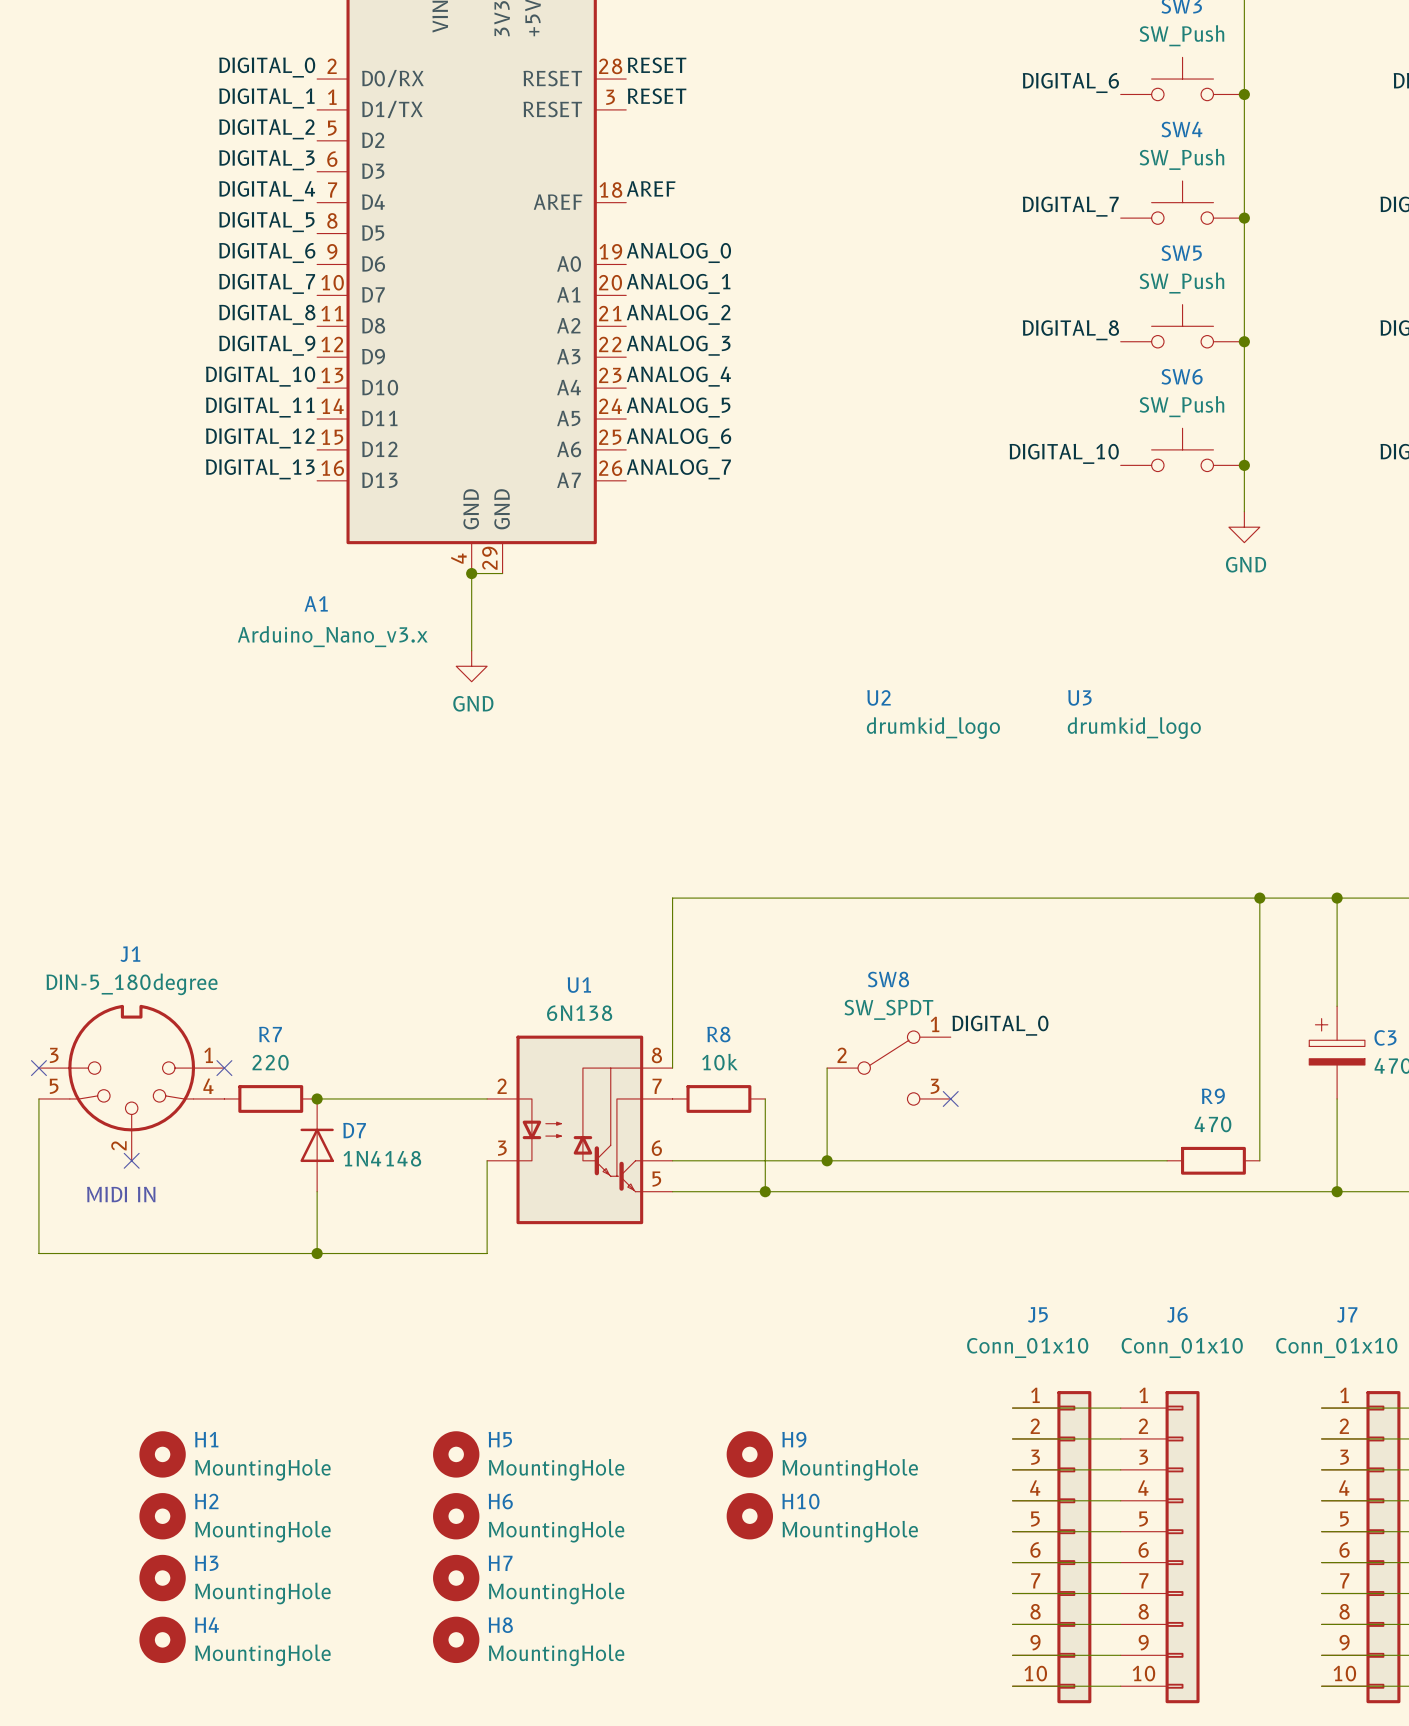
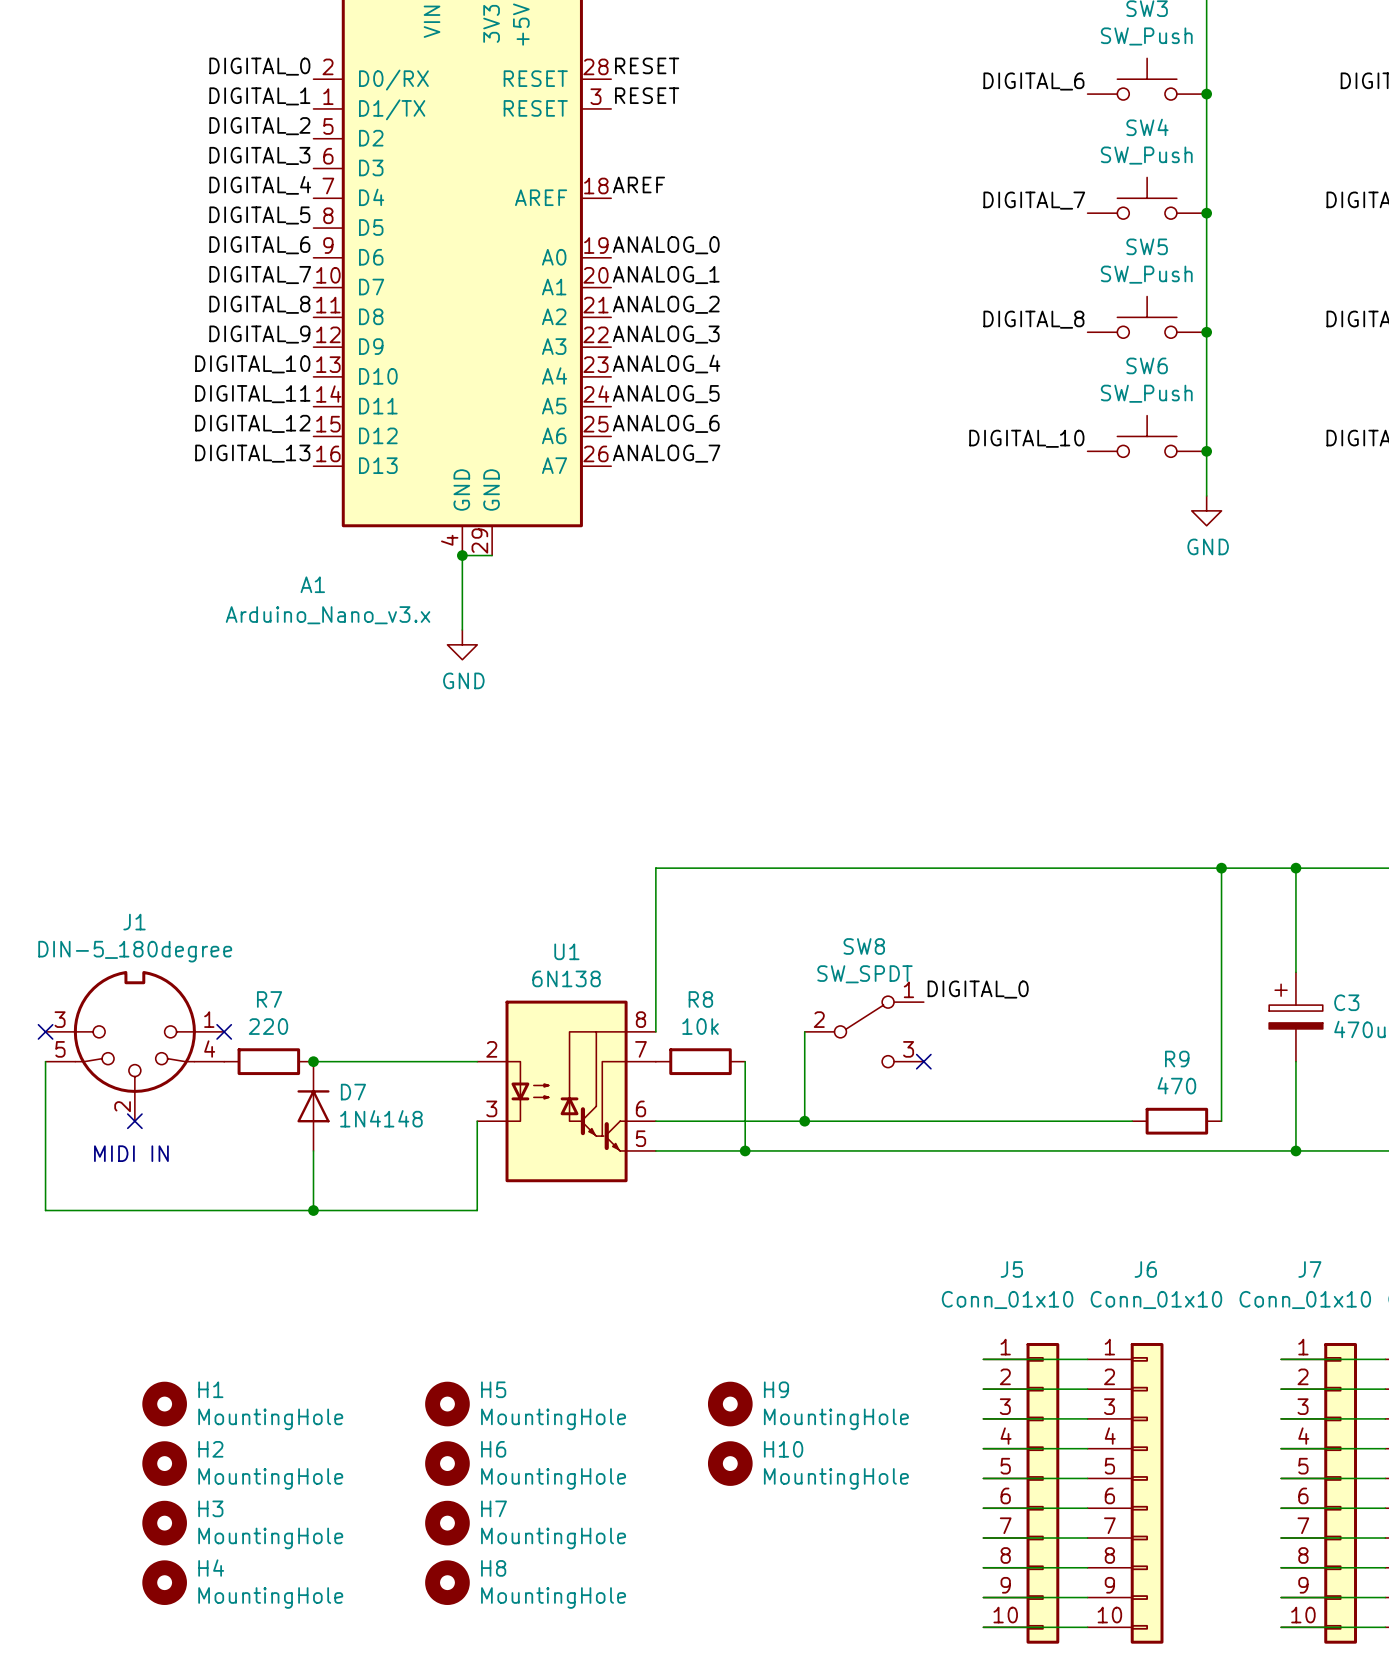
U2: drumkid_logo (933, 714) -> none
U3: drumkid_logo (1134, 714) -> none

